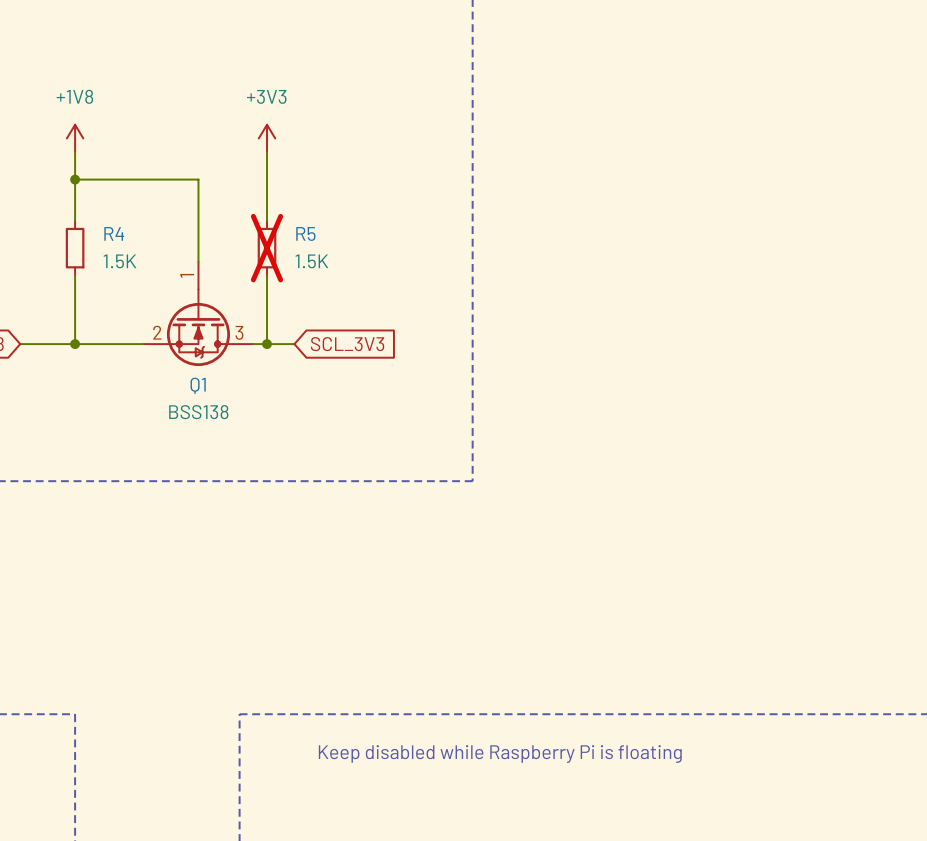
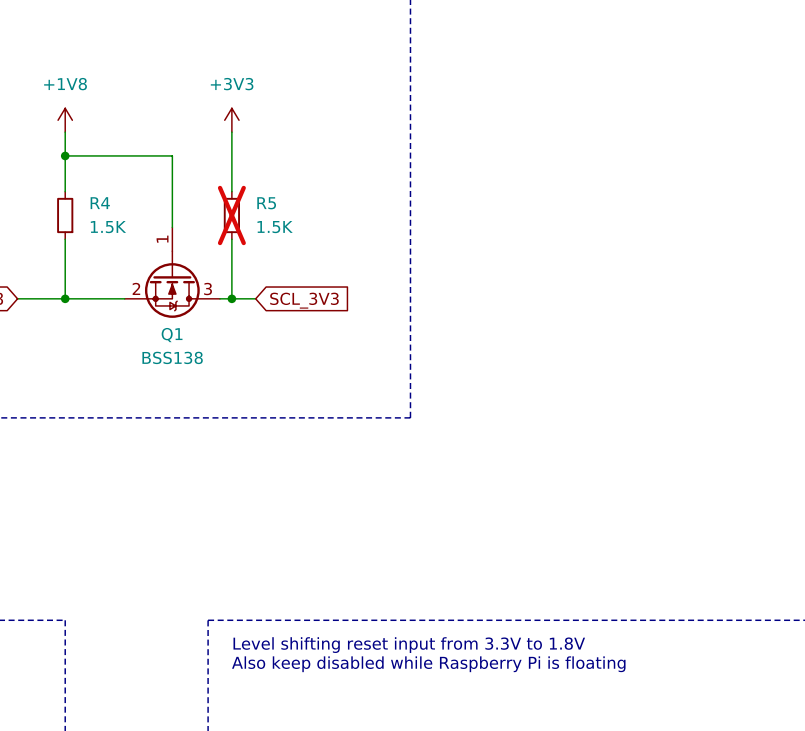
text: none -> Level shifting reset input from 3.3V to 1.8V (409, 645)
text: Keep disabled while Raspberry Pi is floating (500, 754) -> Also keep disabled while Raspberry Pi is floating (428, 664)

